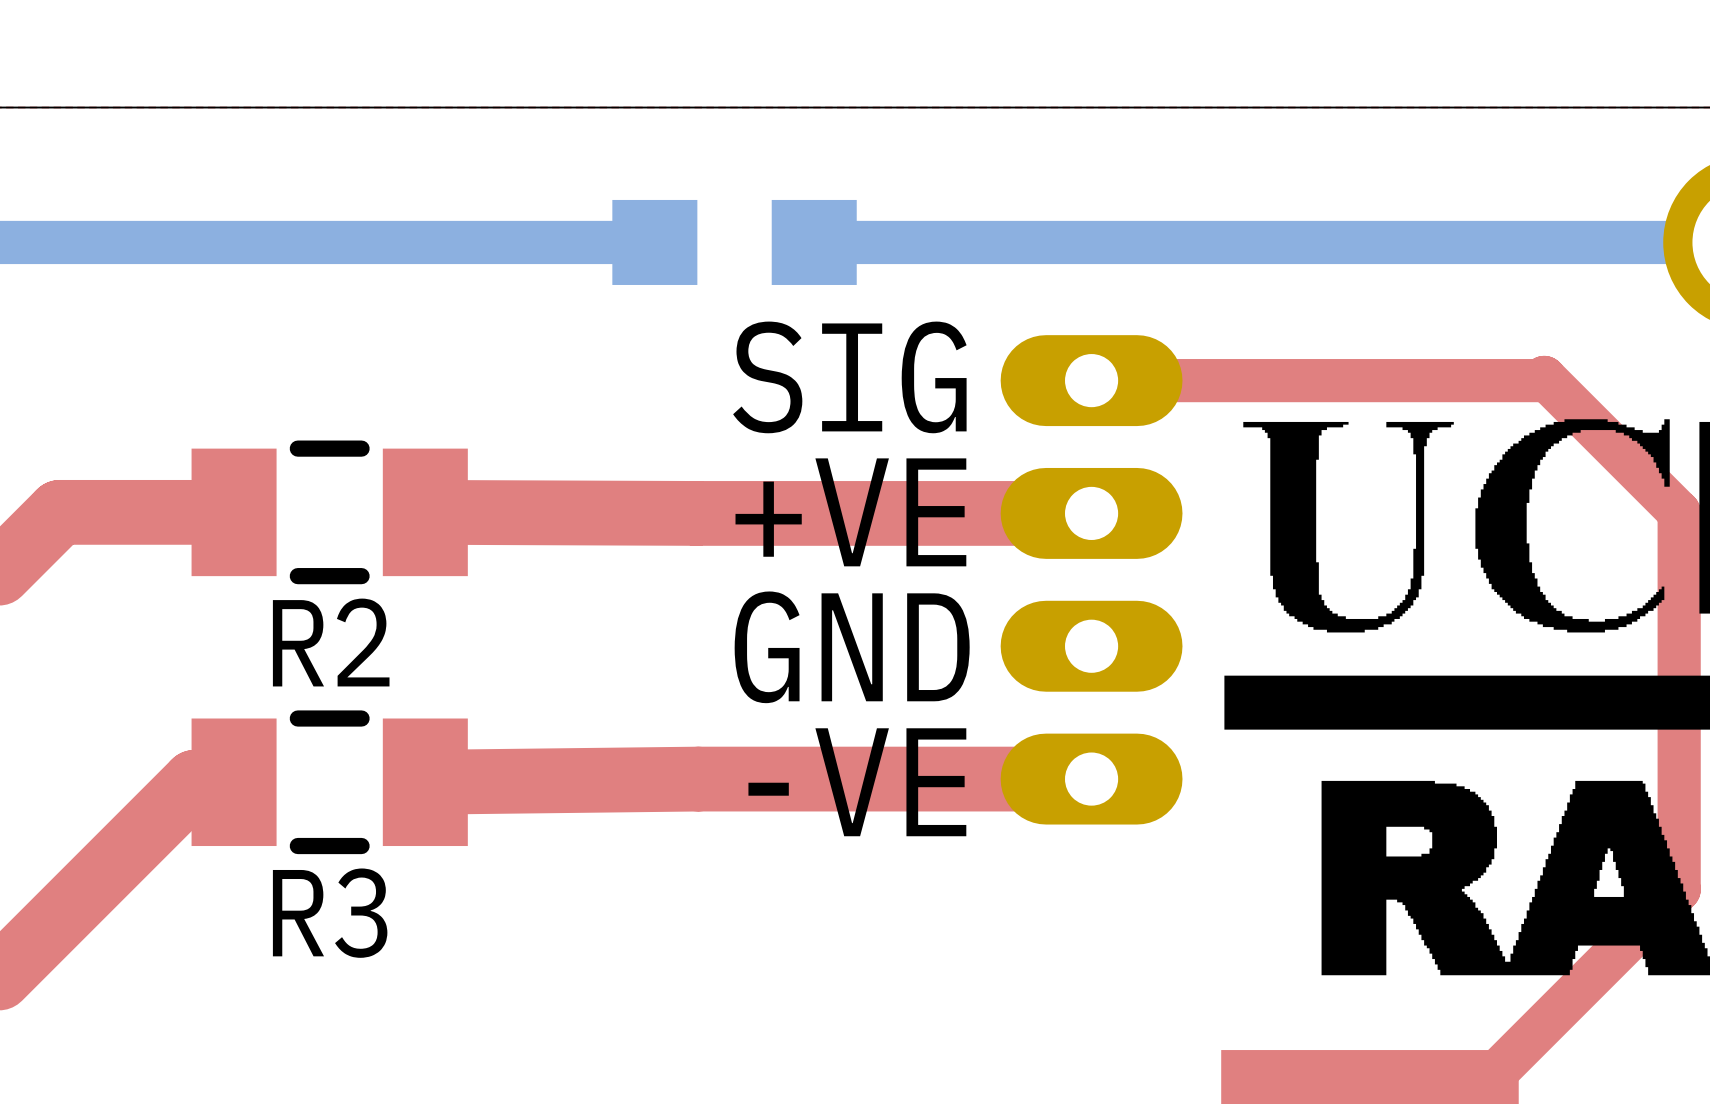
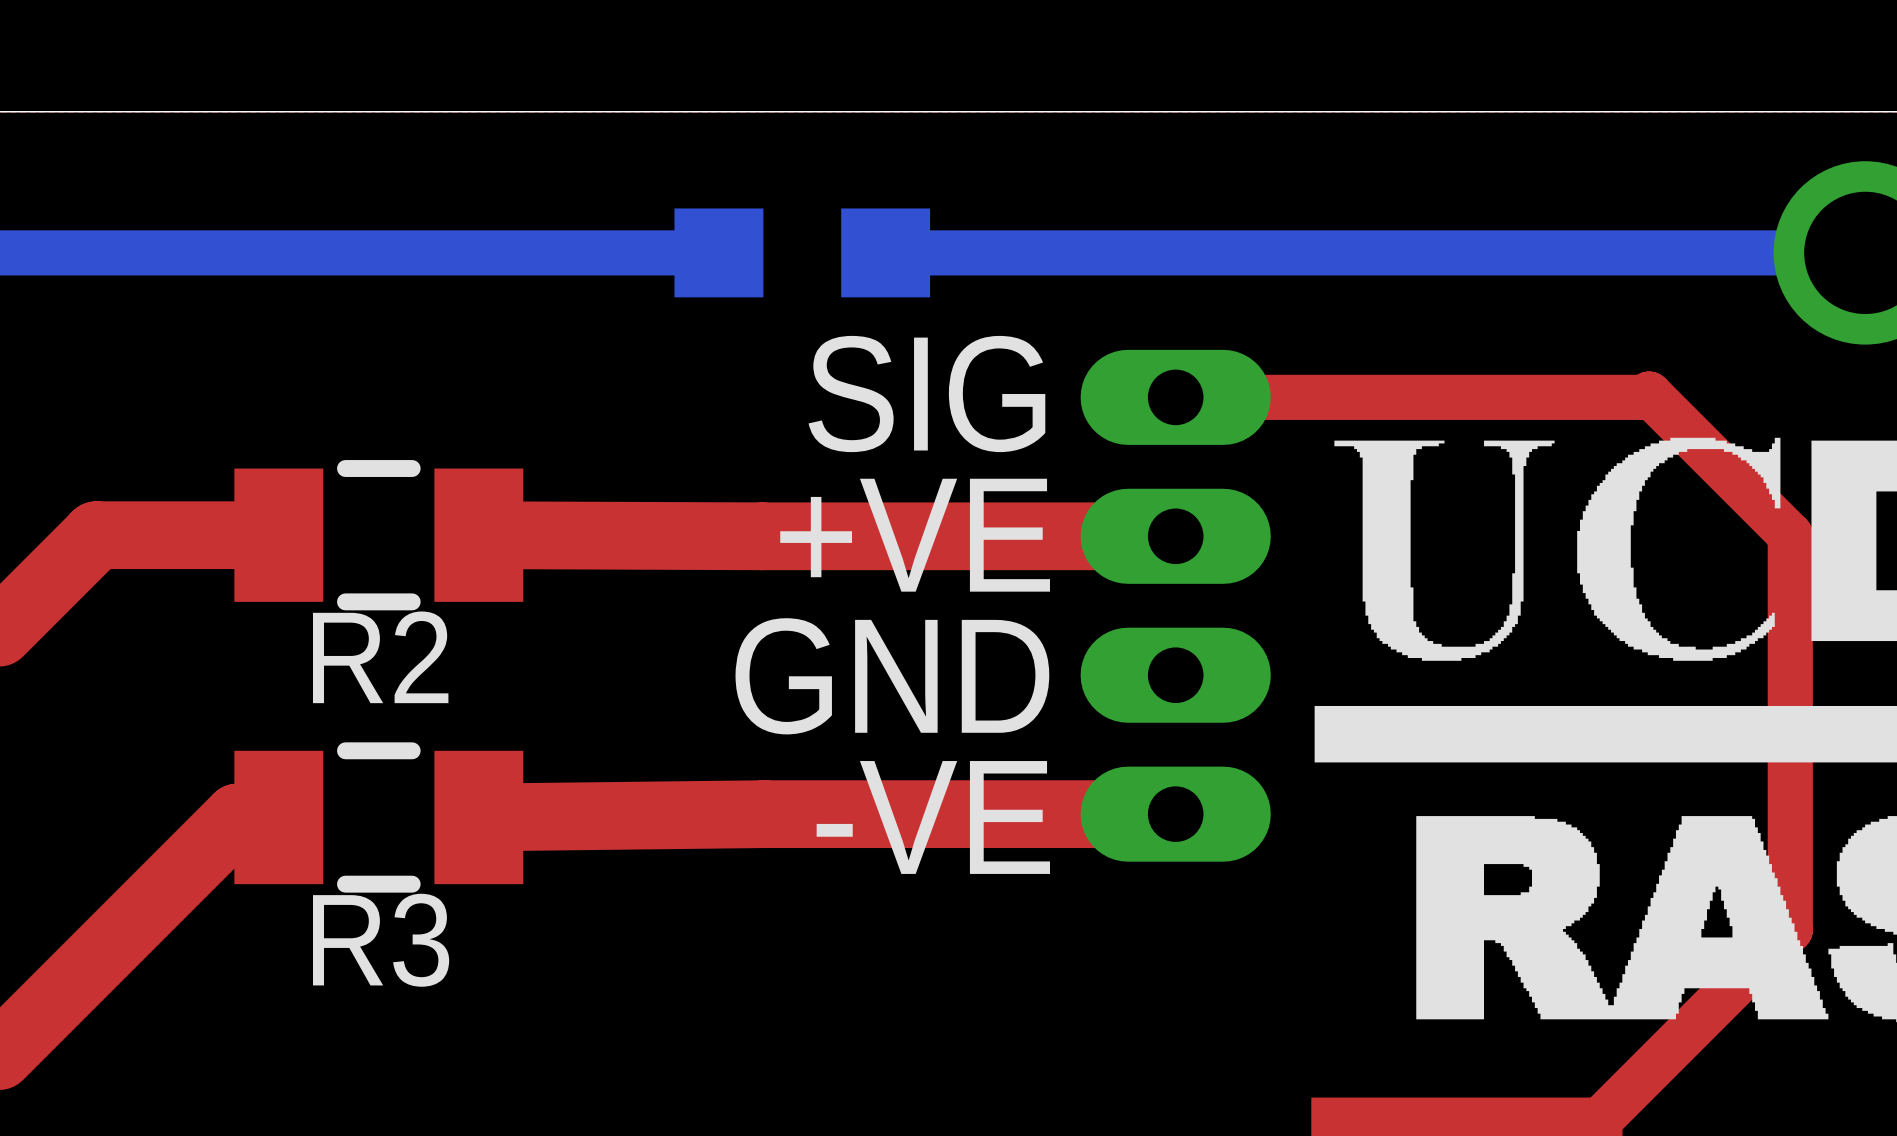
R2 name position: R2 (331, 642) -> R2 (380, 657)
R3 name position: R3 (330, 913) -> R3 (381, 940)

